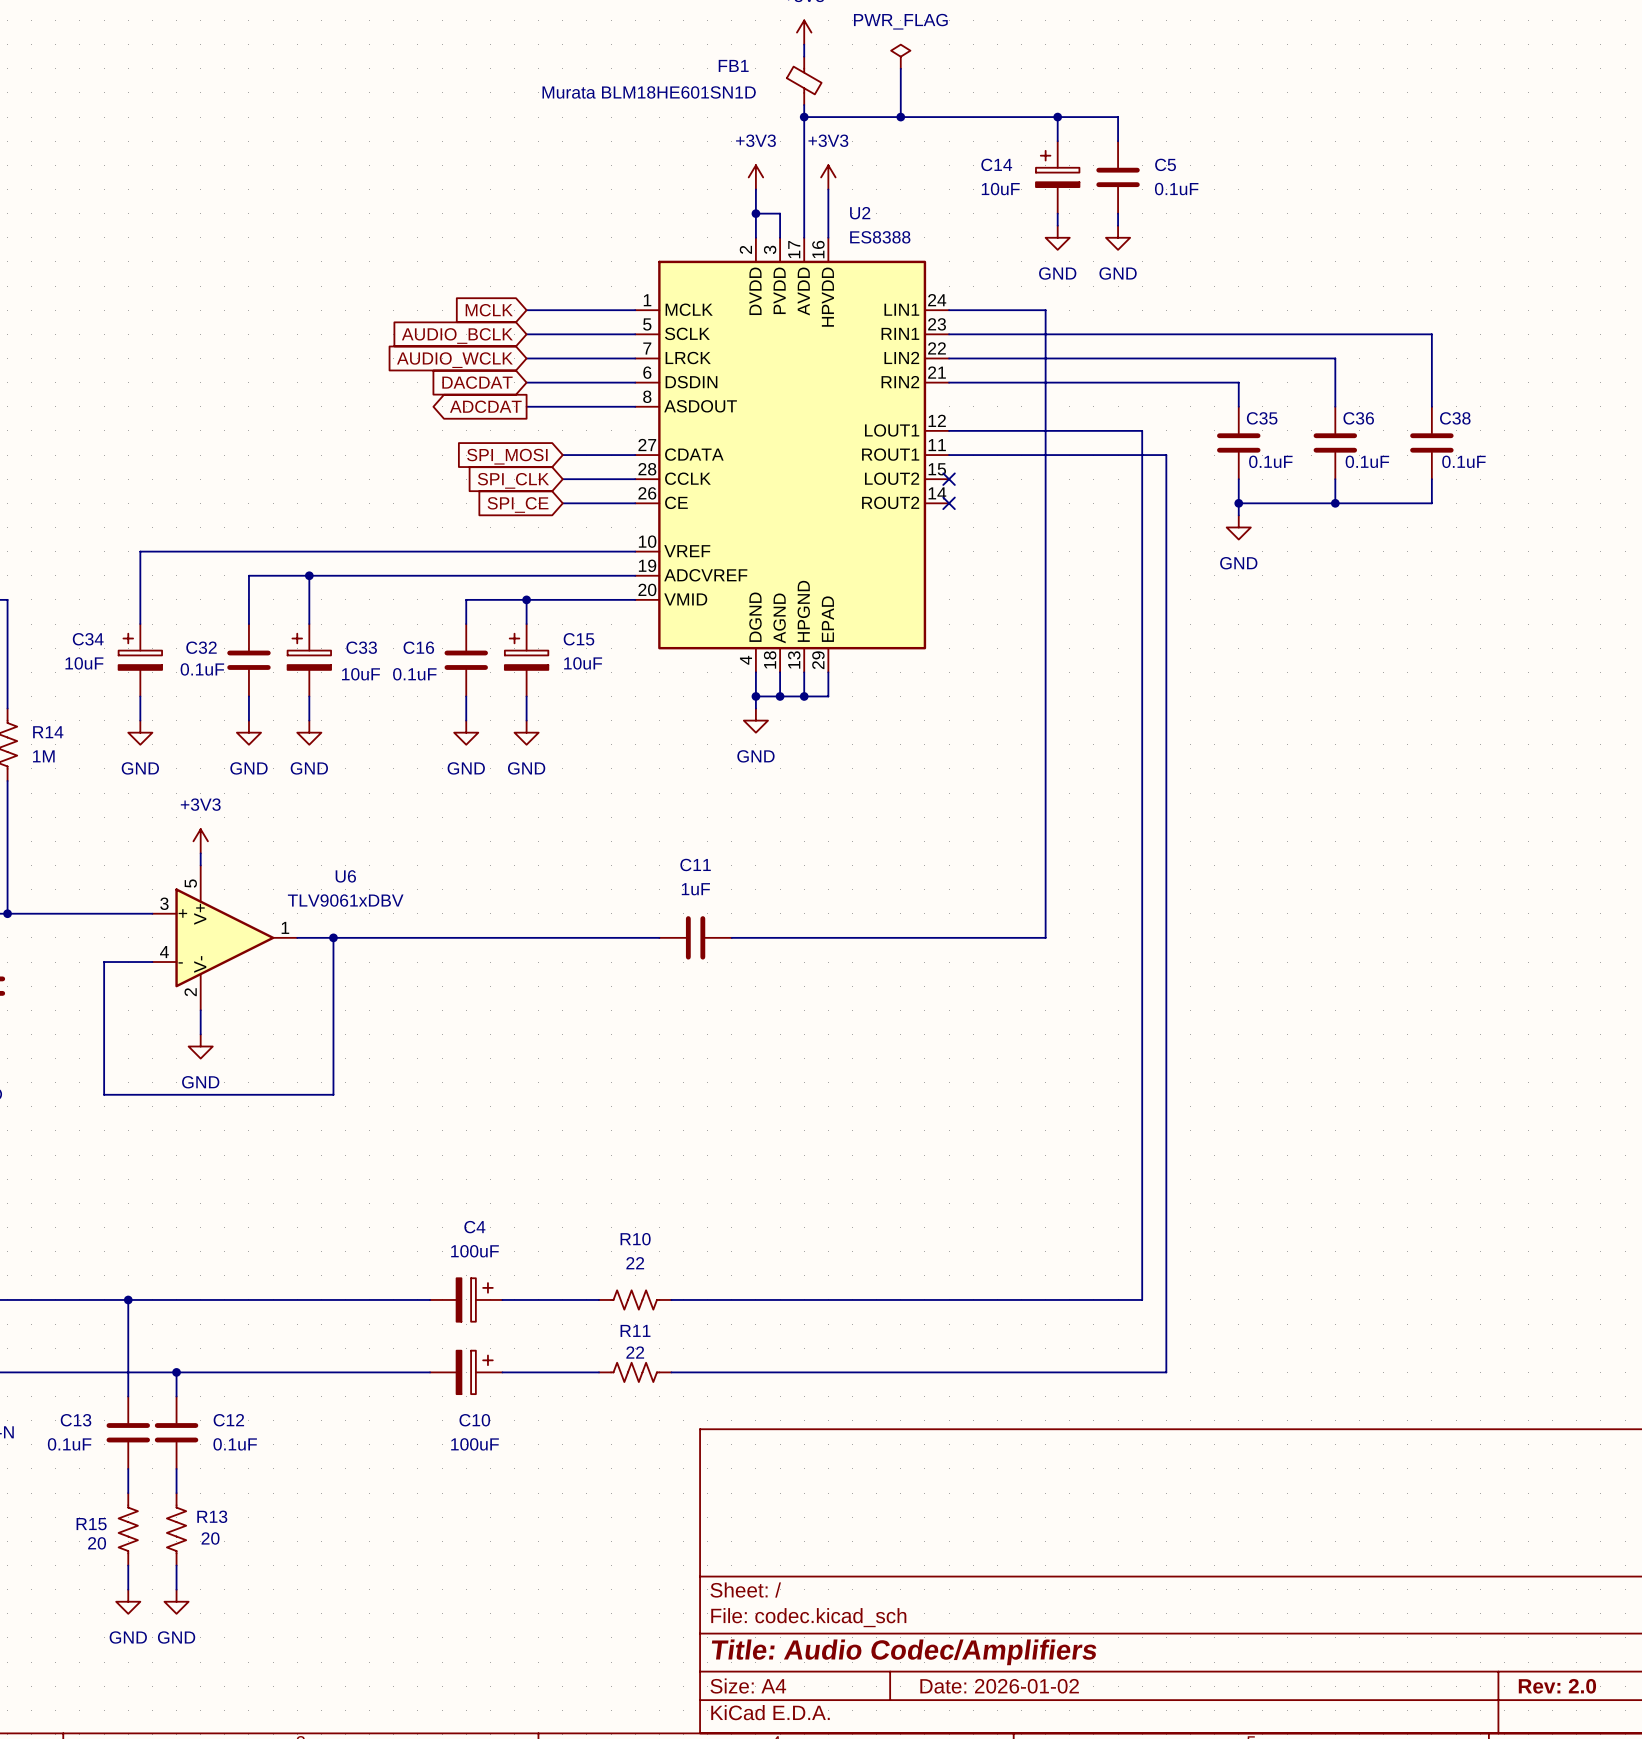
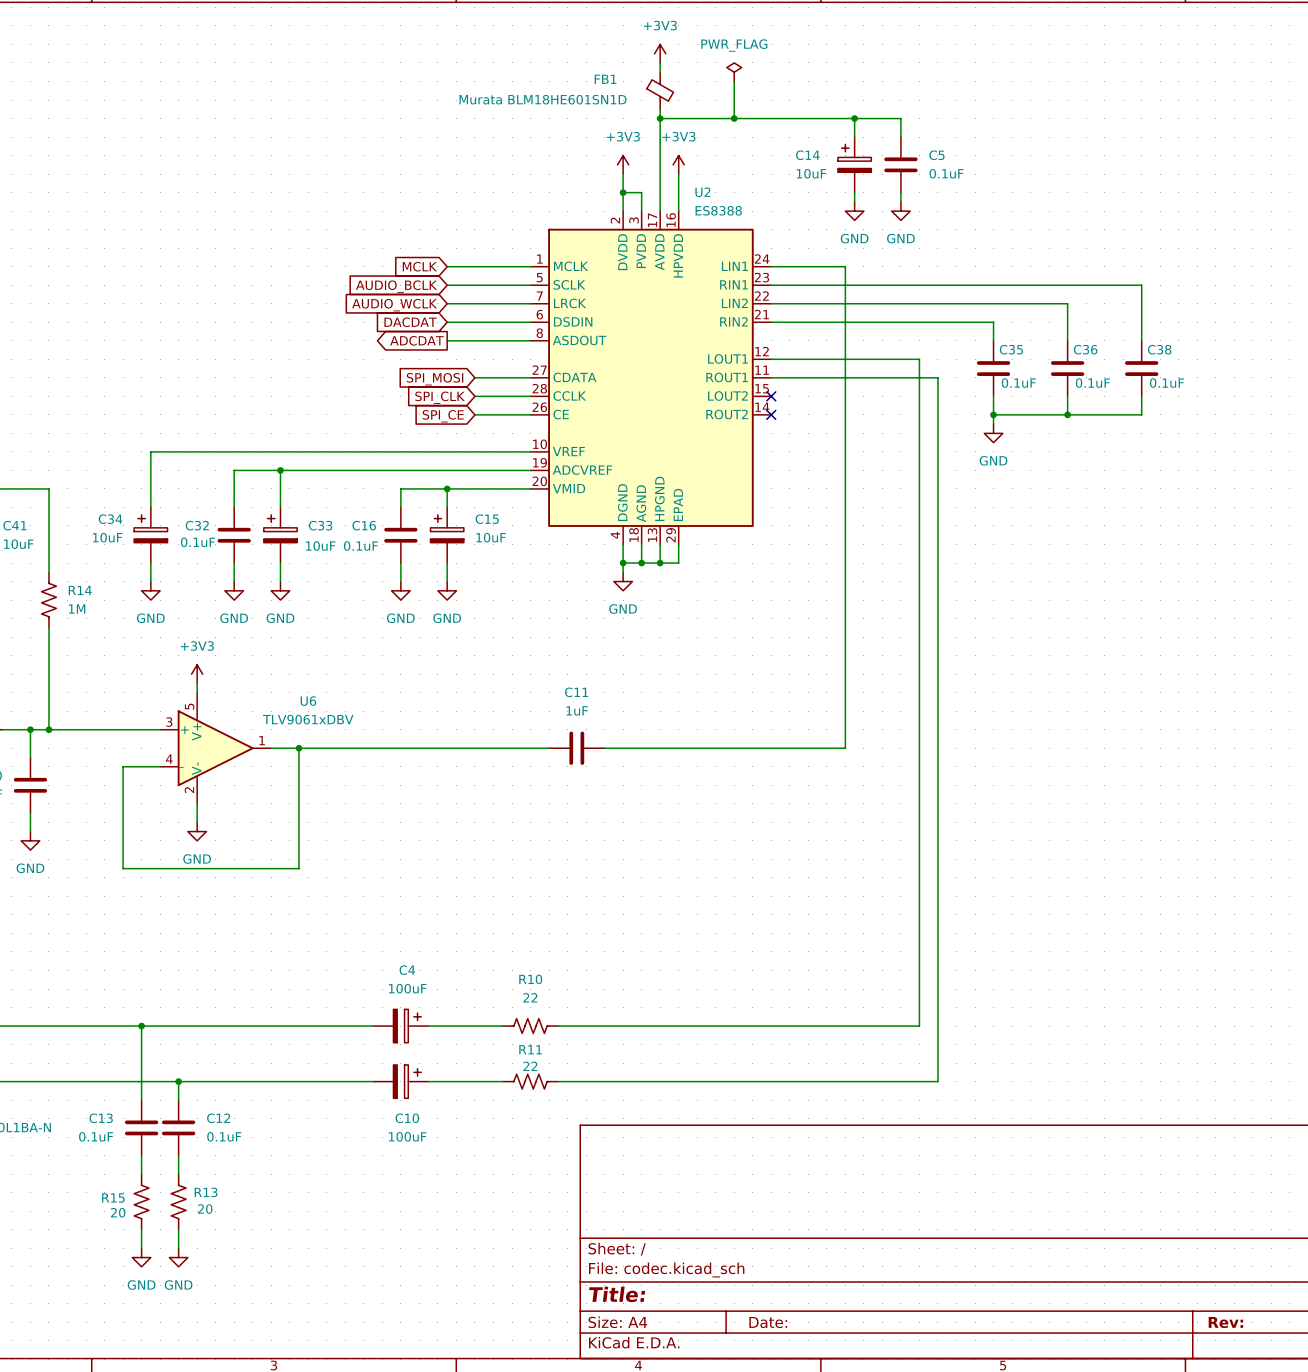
title block: Title: Audio Codec/Amplifiers (904, 1652) -> Title: (617, 1294)
title block: Date: 2026-01-02 (999, 1686) -> Date: (768, 1322)
title block: Rev: 2.0 (1557, 1686) -> Rev: (1225, 1322)

